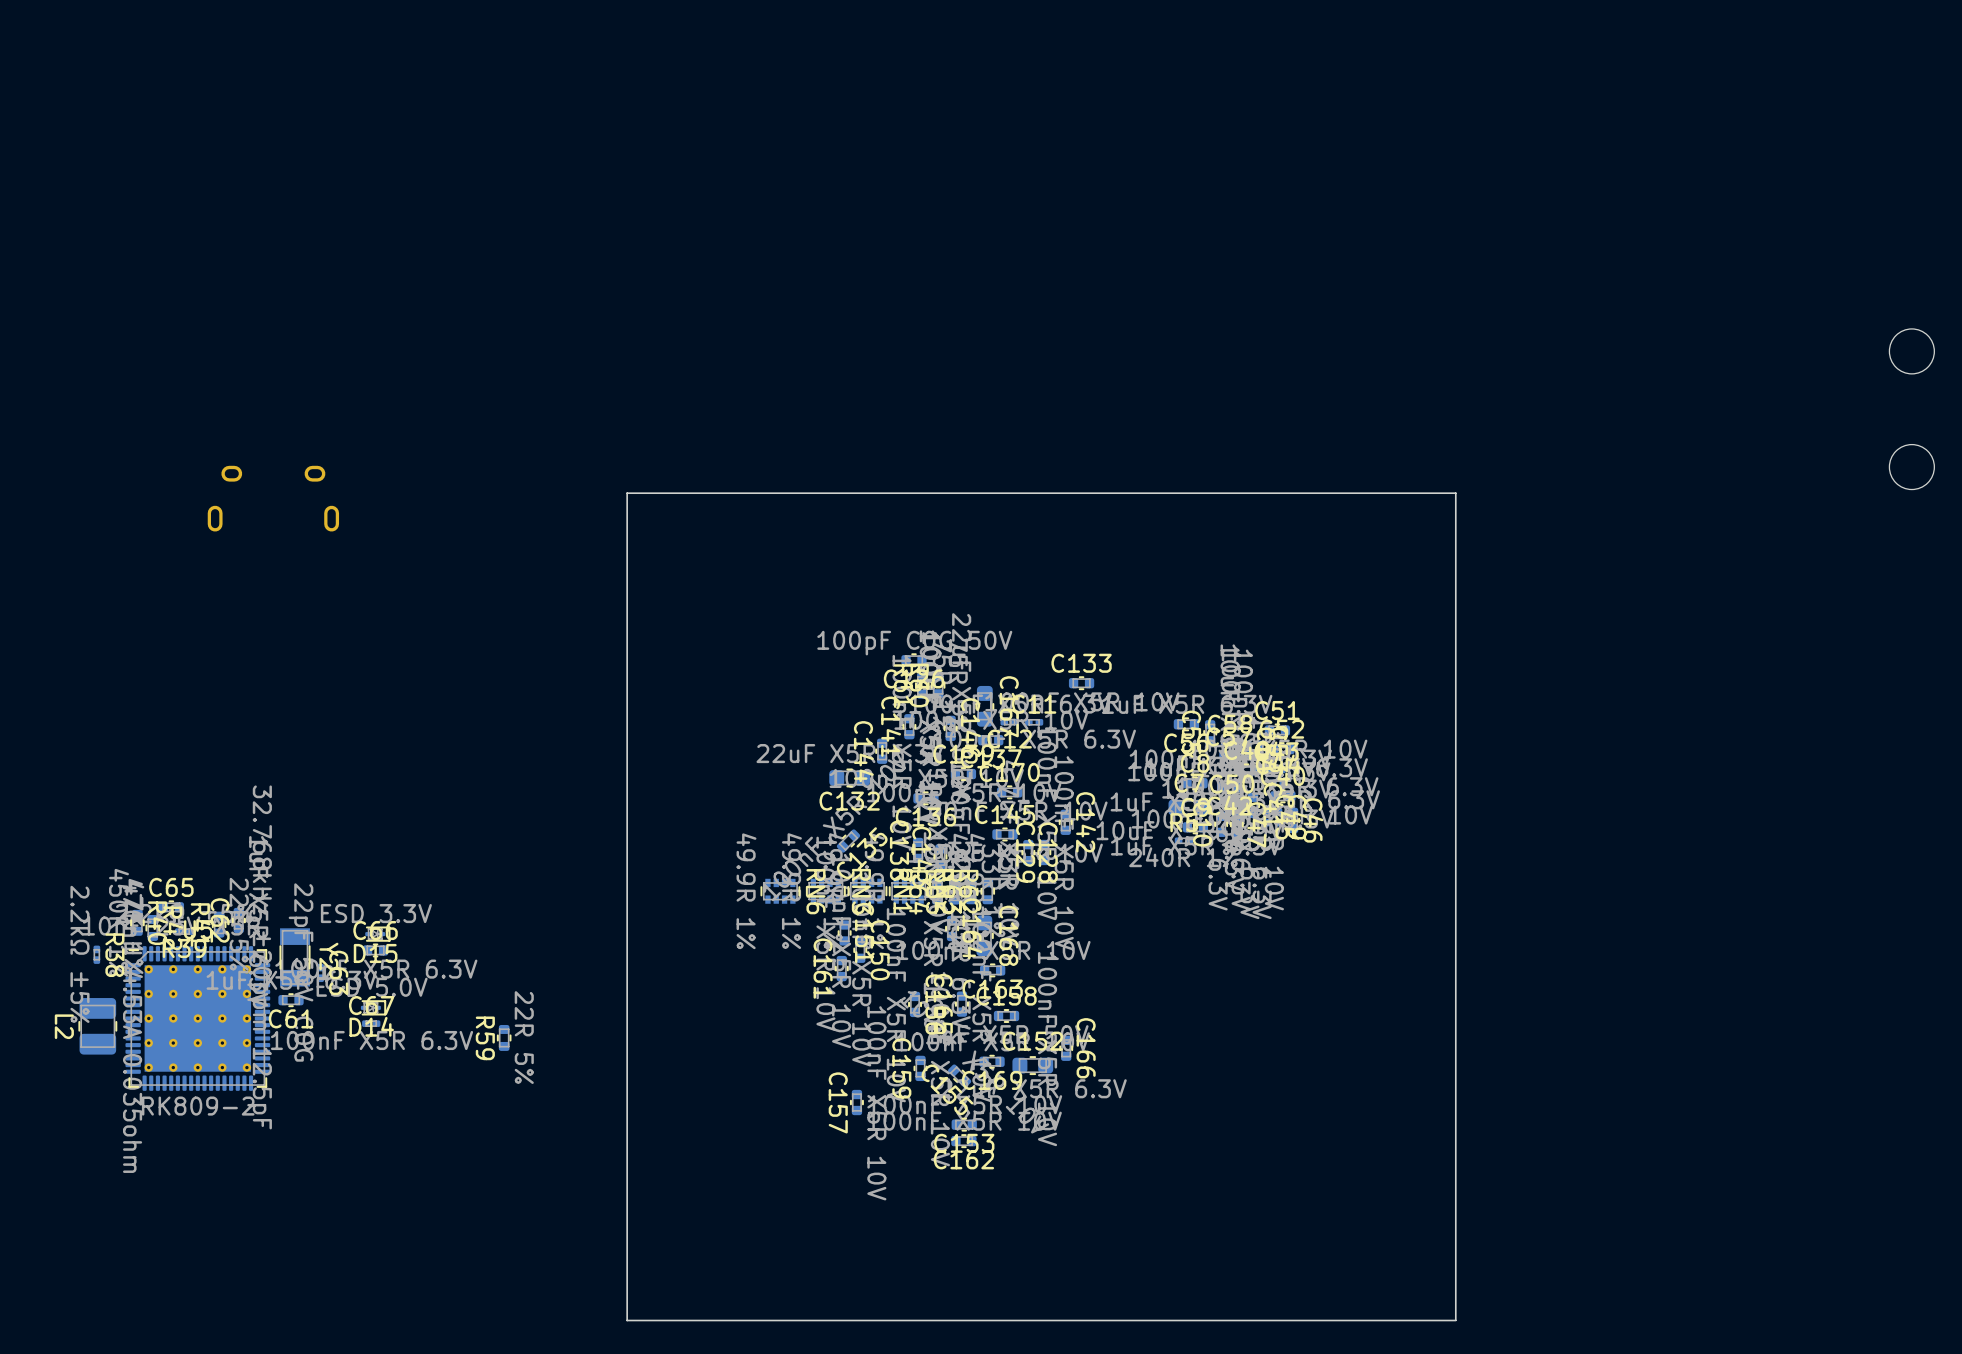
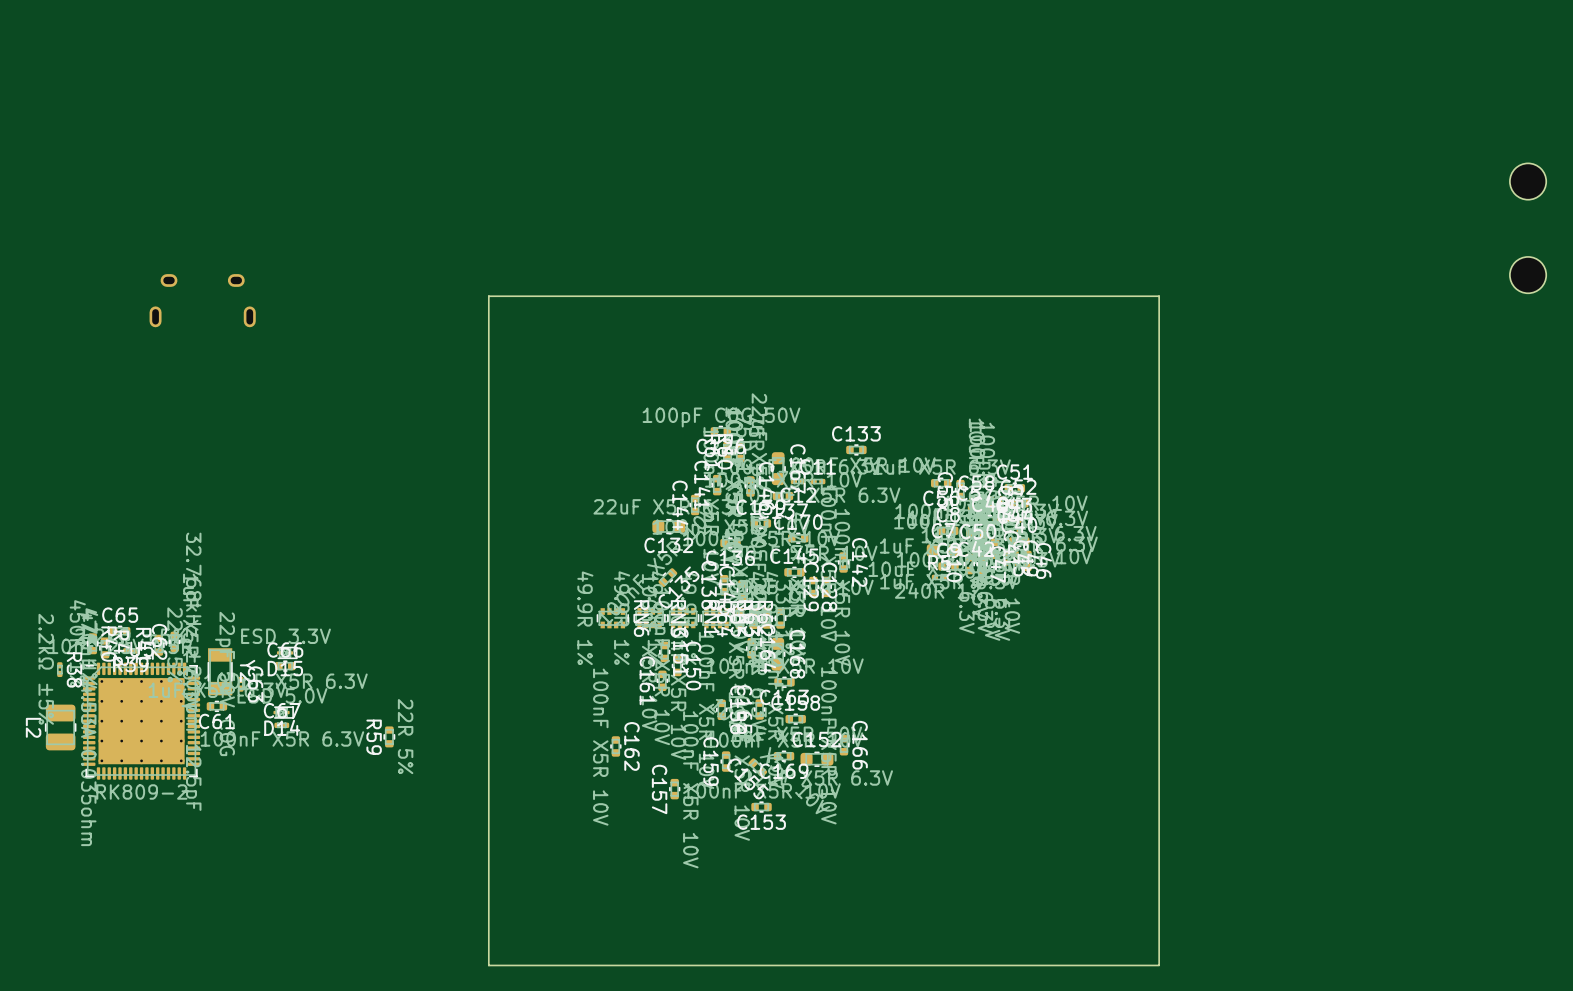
C162 rotation: 0° (963, 1141) -> 90° clockwise (615, 746)
C162 position: (963, 1141) -> (615, 746)

